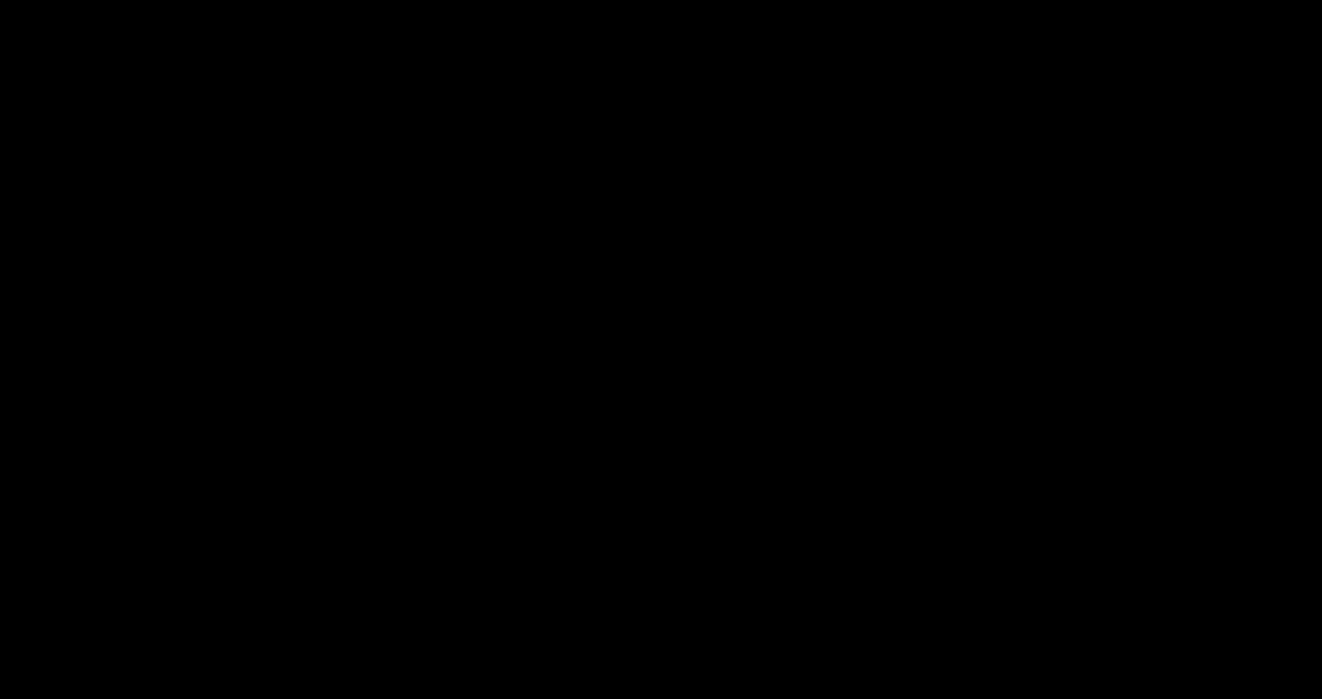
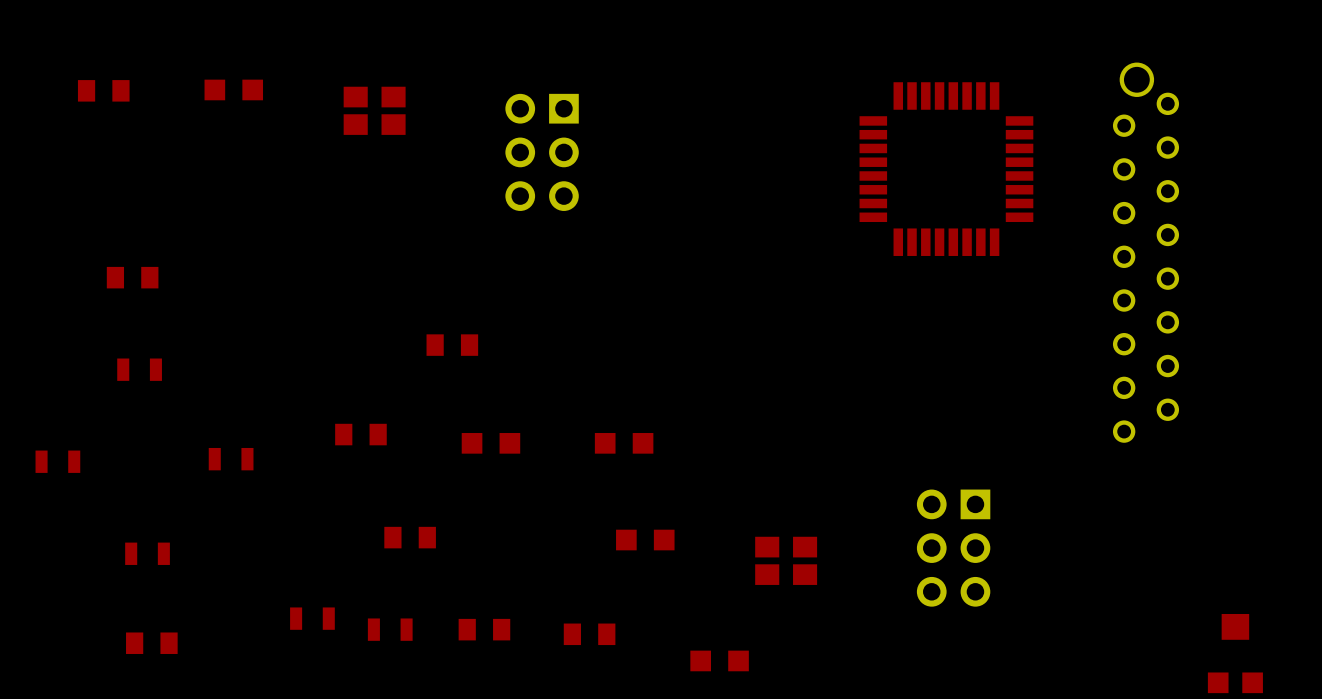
part: none -> (233, 89)
part: none -> (103, 90)
part: none -> (374, 110)
part: none -> (542, 152)
part: none -> (946, 169)
part: none -> (1145, 252)
part: none -> (132, 277)
part: none -> (452, 345)
part: none -> (139, 369)
part: none -> (360, 434)
part: none -> (490, 443)
part: none -> (624, 443)
part: none -> (231, 459)
part: none -> (57, 461)
part: none -> (410, 537)
part: none -> (645, 540)
part: none -> (953, 548)
part: none -> (147, 553)
part: none -> (786, 560)
part: none -> (312, 618)
part: none -> (390, 629)
part: none -> (484, 629)
part: none -> (589, 634)
part: none -> (151, 643)
part: none -> (1235, 653)
part: none -> (719, 660)

